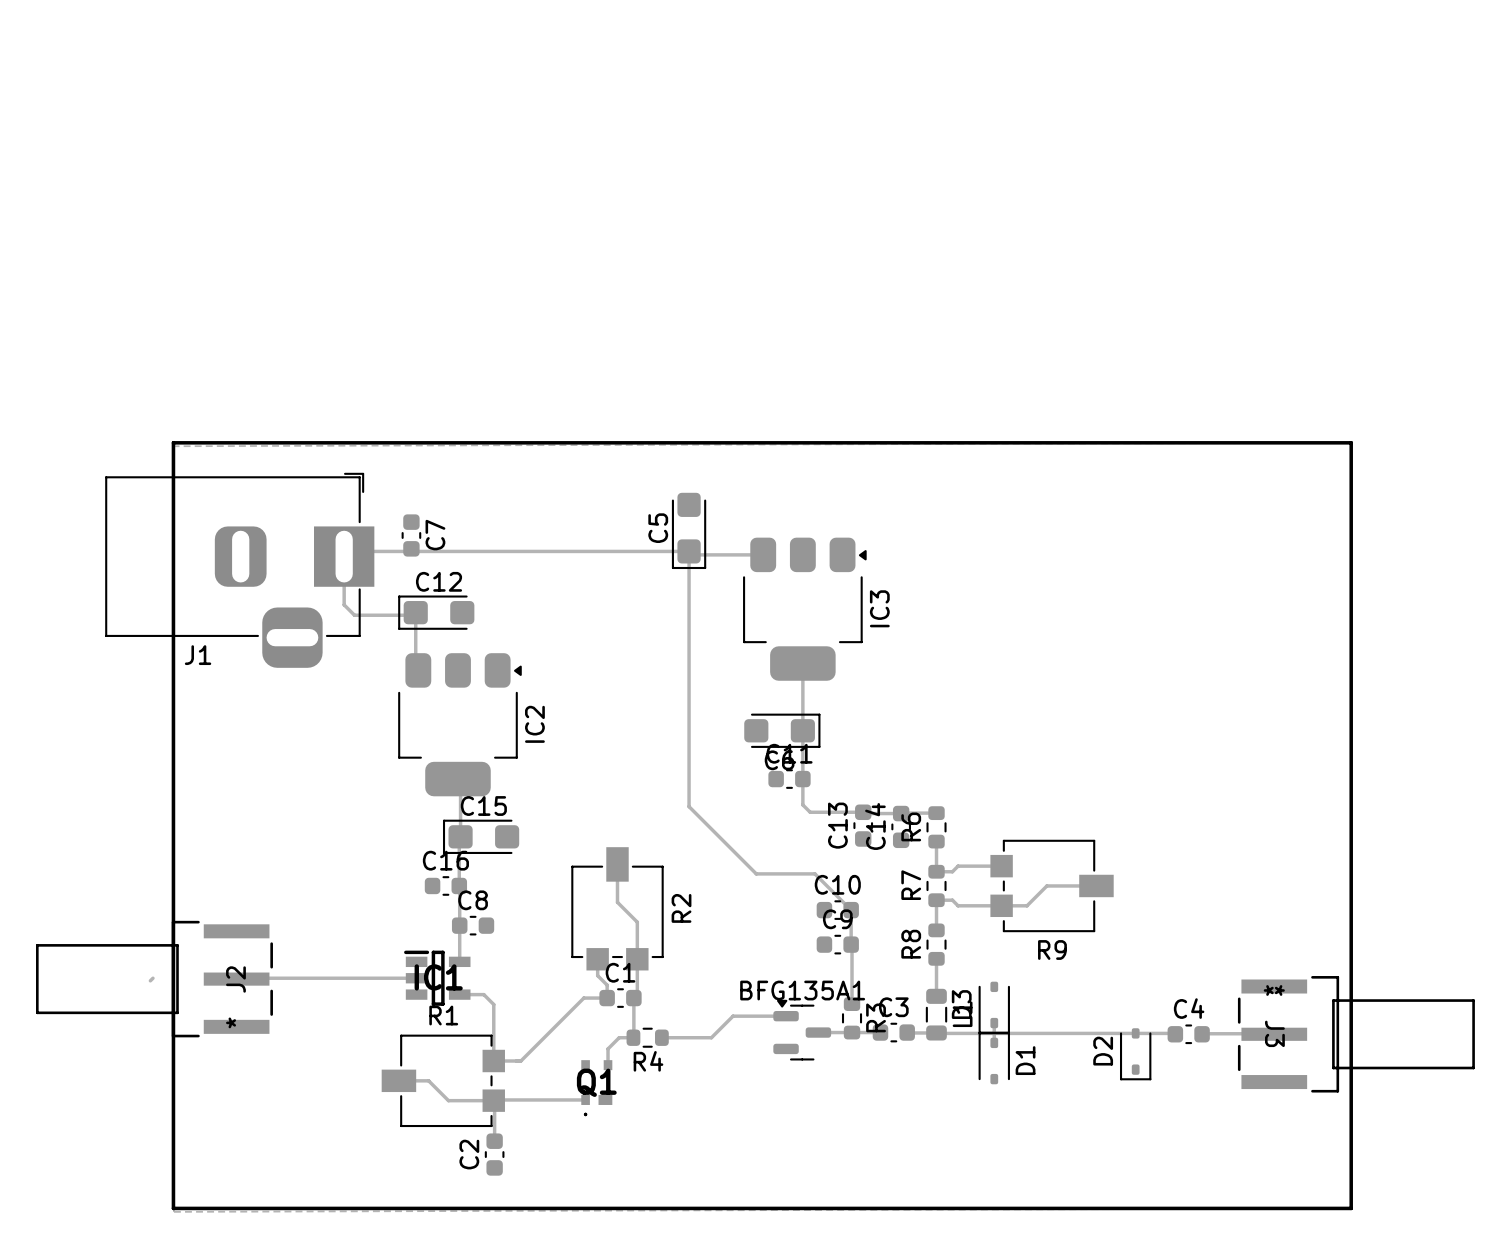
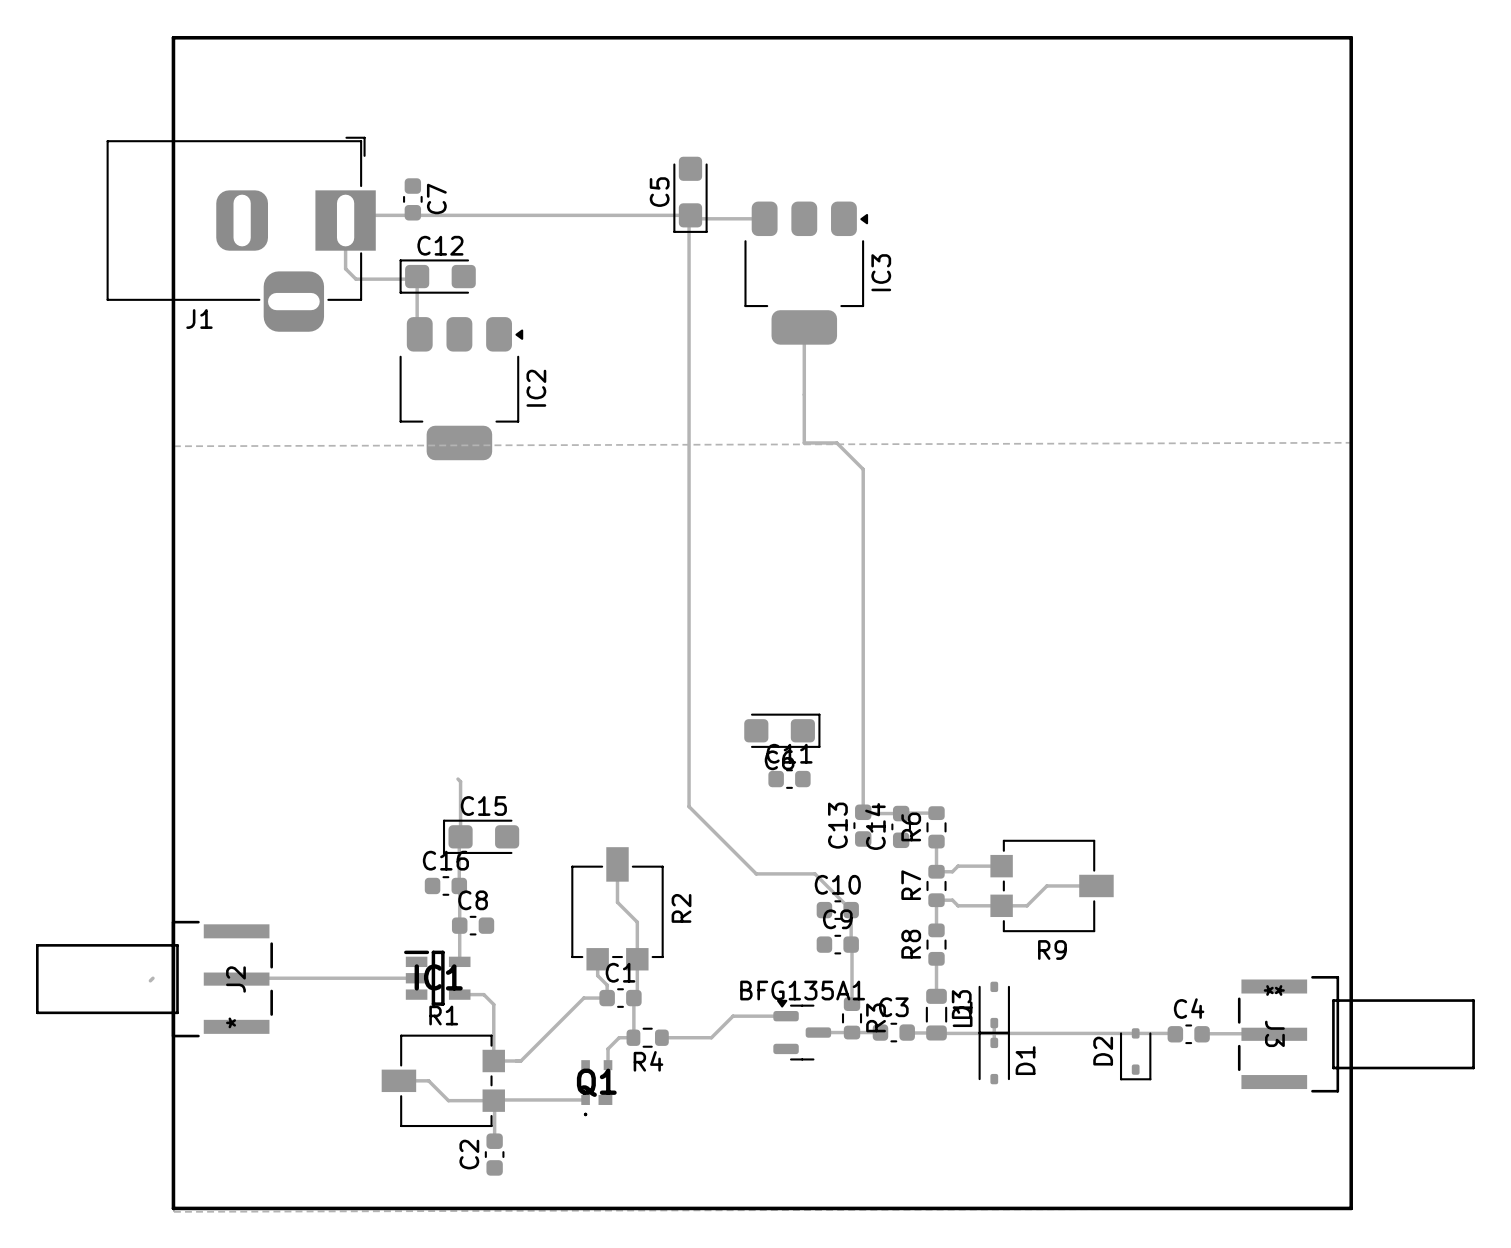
track: none -> (690, 215) (689, 551)
track: none -> (690, 215) (693, 218) (764, 218)
track: none -> (690, 215) (345, 215) (345, 268) (355, 279) (414, 279) (417, 276) (417, 331) (419, 334)
board edge: (173, 442) (1351, 442) -> (173, 442) (173, 37) (1351, 37) (1351, 442)
C5 position: (689, 530) -> (690, 194)
C7 position: (411, 535) -> (412, 199)
track: (763, 554) (692, 554) (689, 551) (344, 551) (344, 604) (354, 615) (413, 615) (415, 612) (415, 667) (418, 670) -> none
J1 position: (239, 570) -> (241, 234)
IC3 position: (804, 609) -> (806, 273)
C12 position: (436, 612) -> (437, 276)
track: (802, 663) (802, 804) (810, 812) (863, 812) -> (804, 327) (804, 442) (836, 442) (863, 469) (863, 812)
IC2 position: (459, 724) -> (461, 388)

